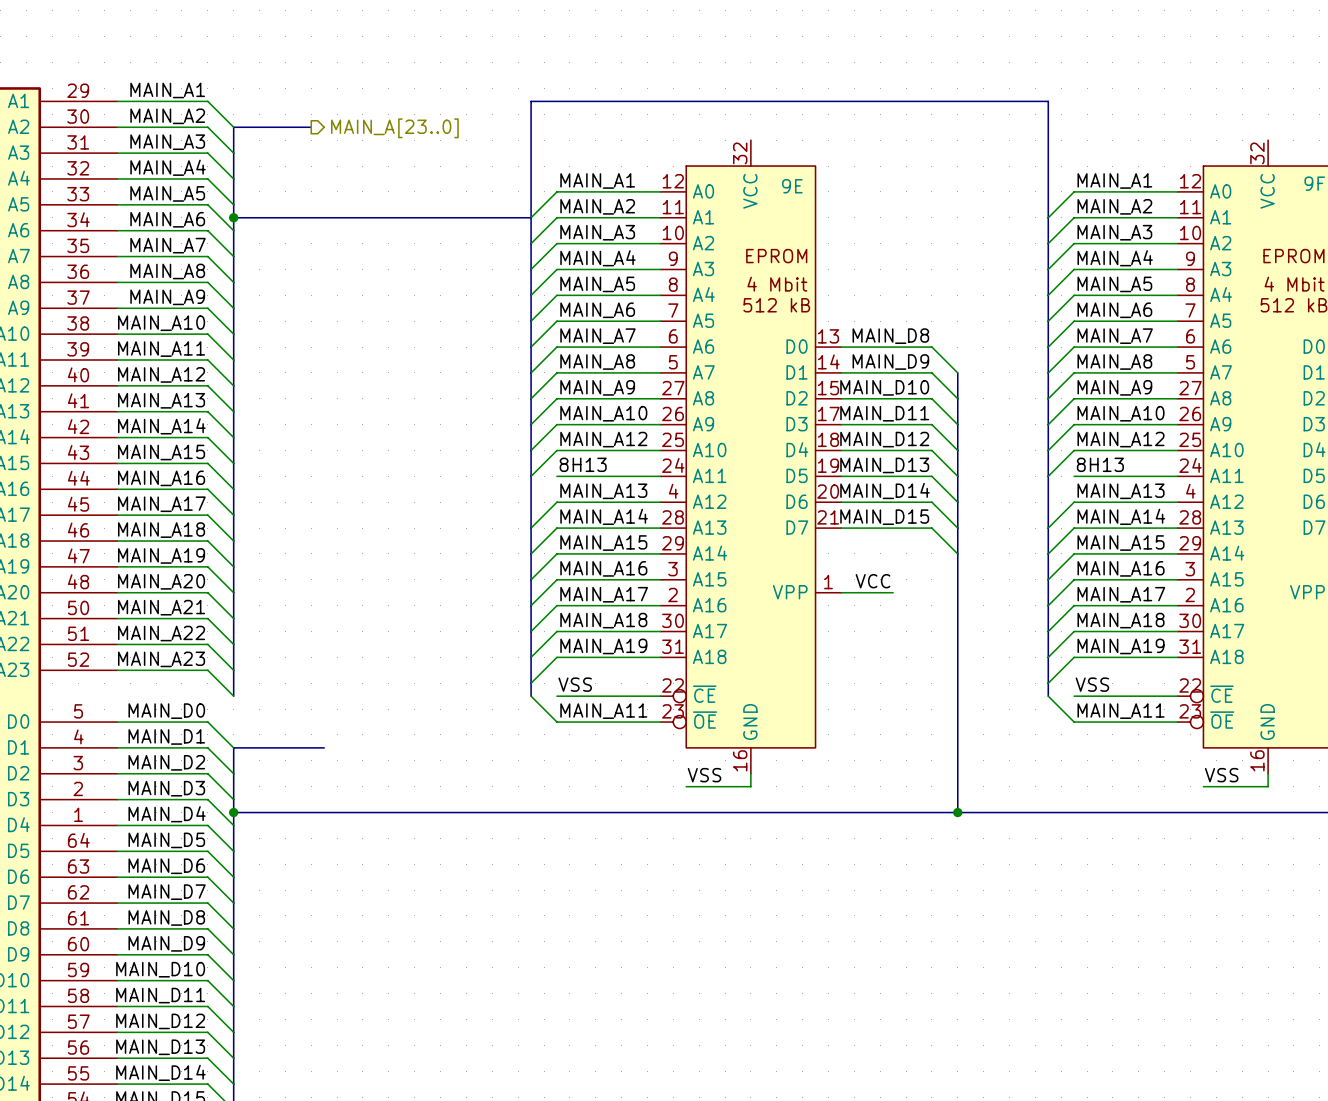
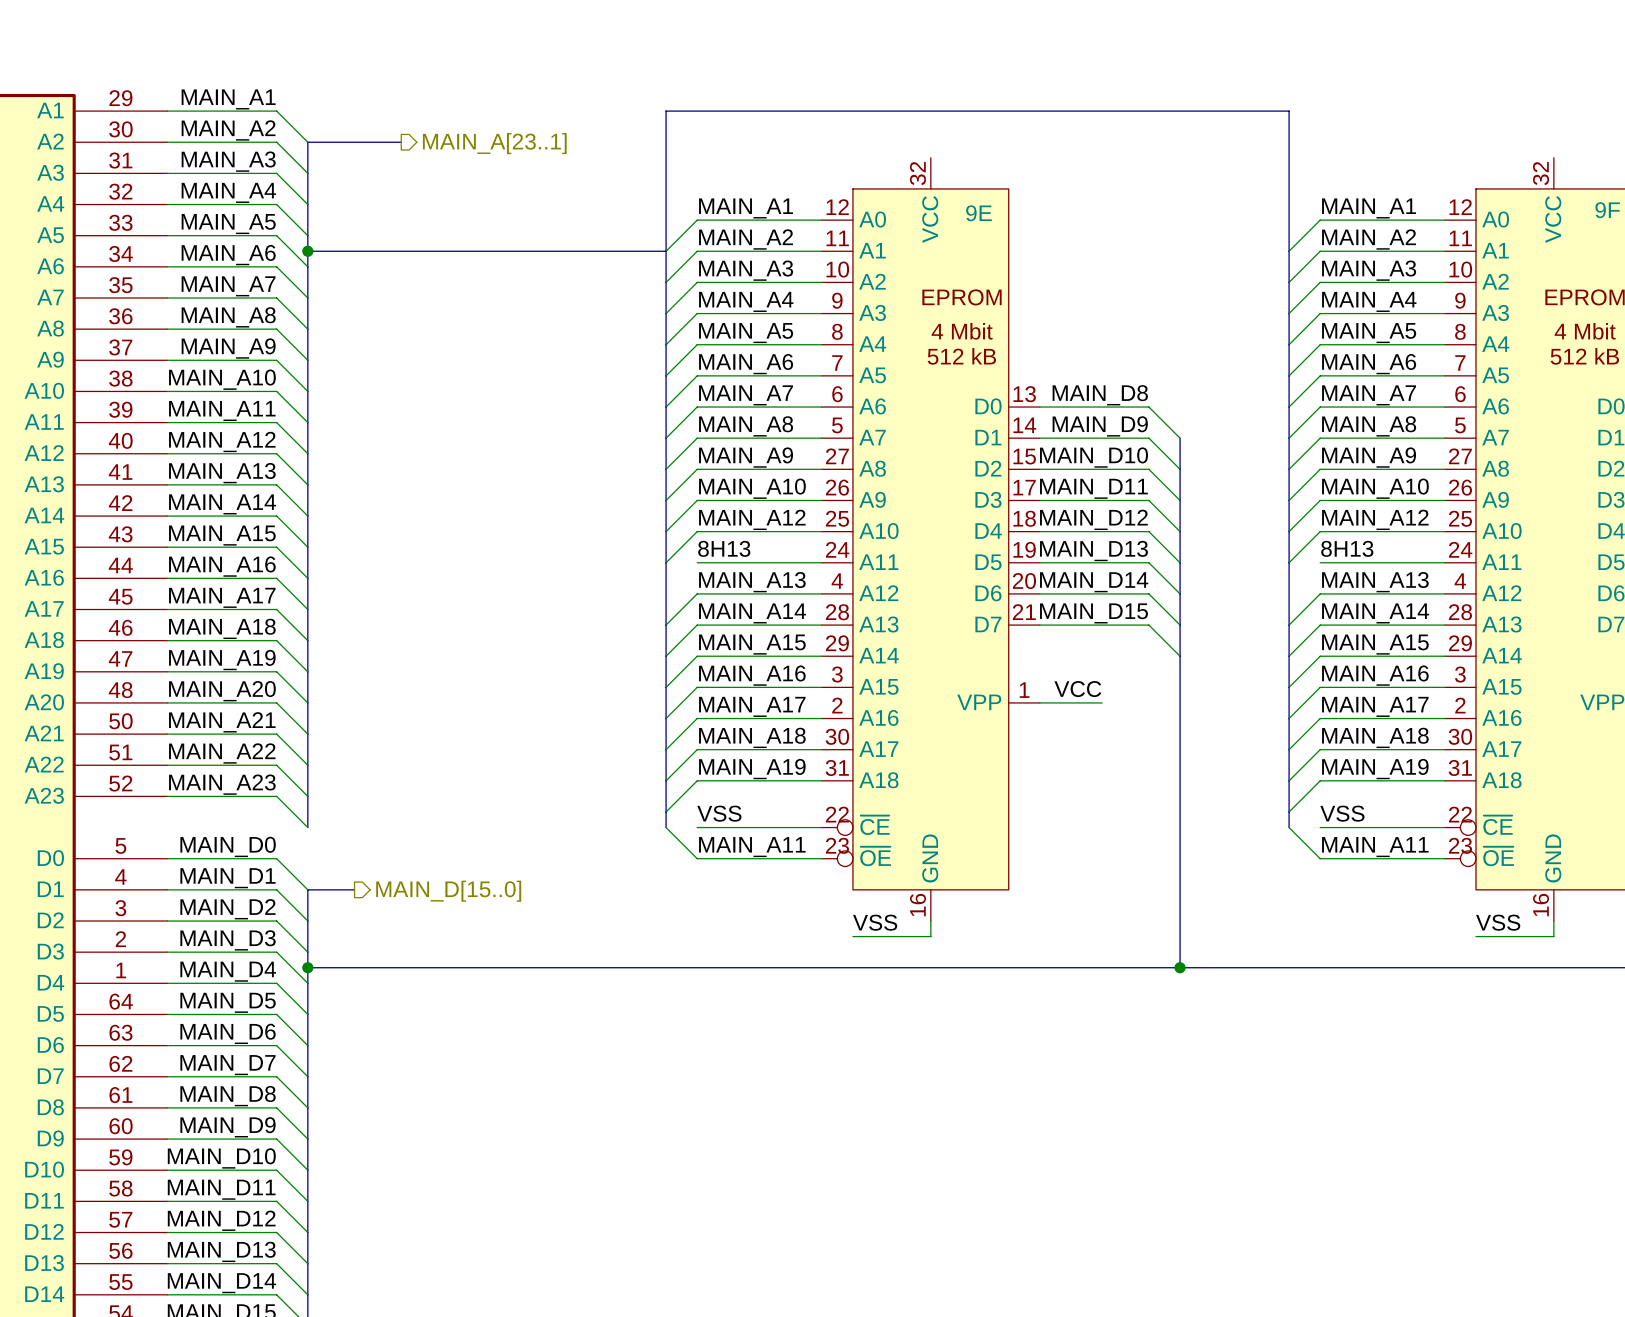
hierarchical label: MAIN_A[23..0] (394, 128) -> MAIN_A[23..1] (494, 143)
bus: (272, 747) (324, 747) -> none
hierarchical label: none -> MAIN_D[15..0] (448, 891)

